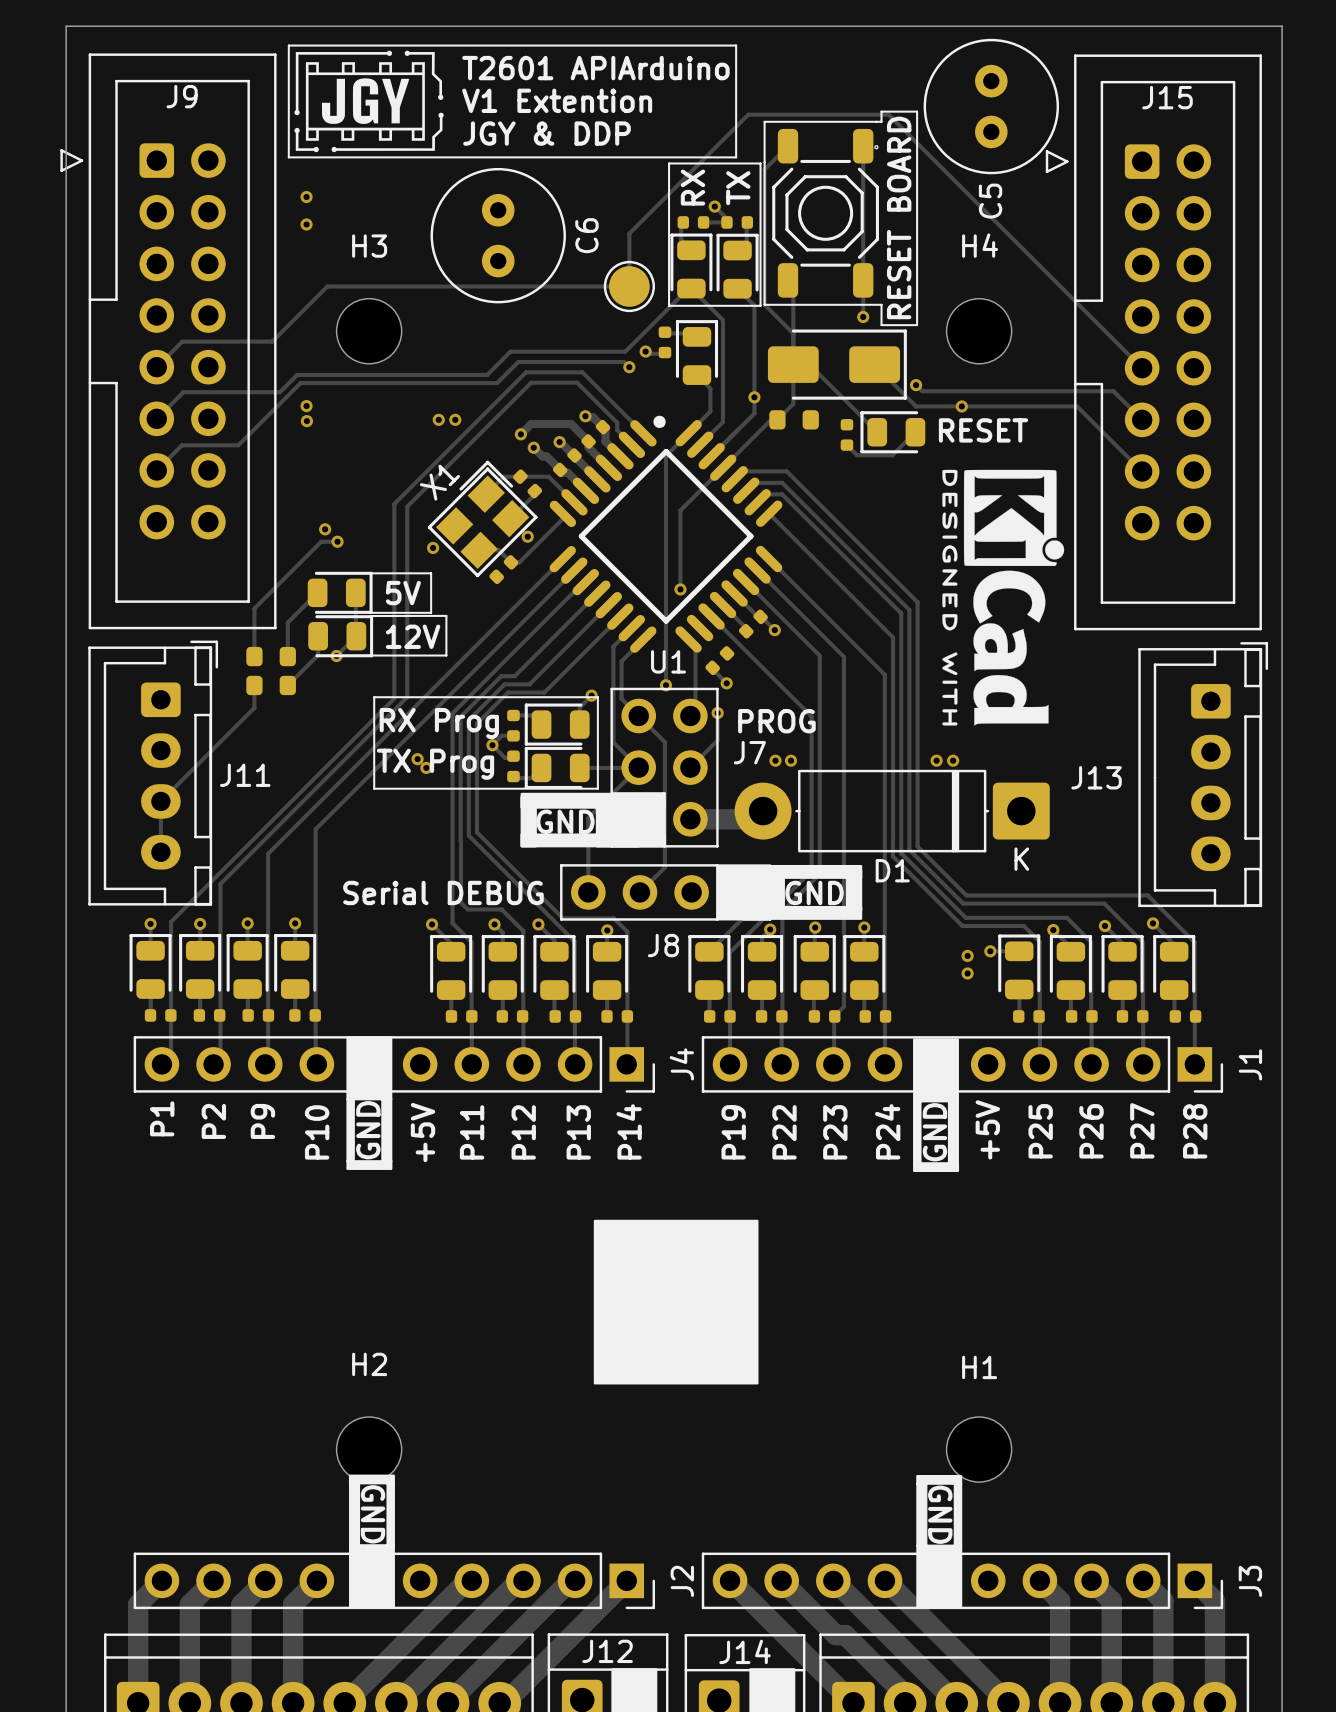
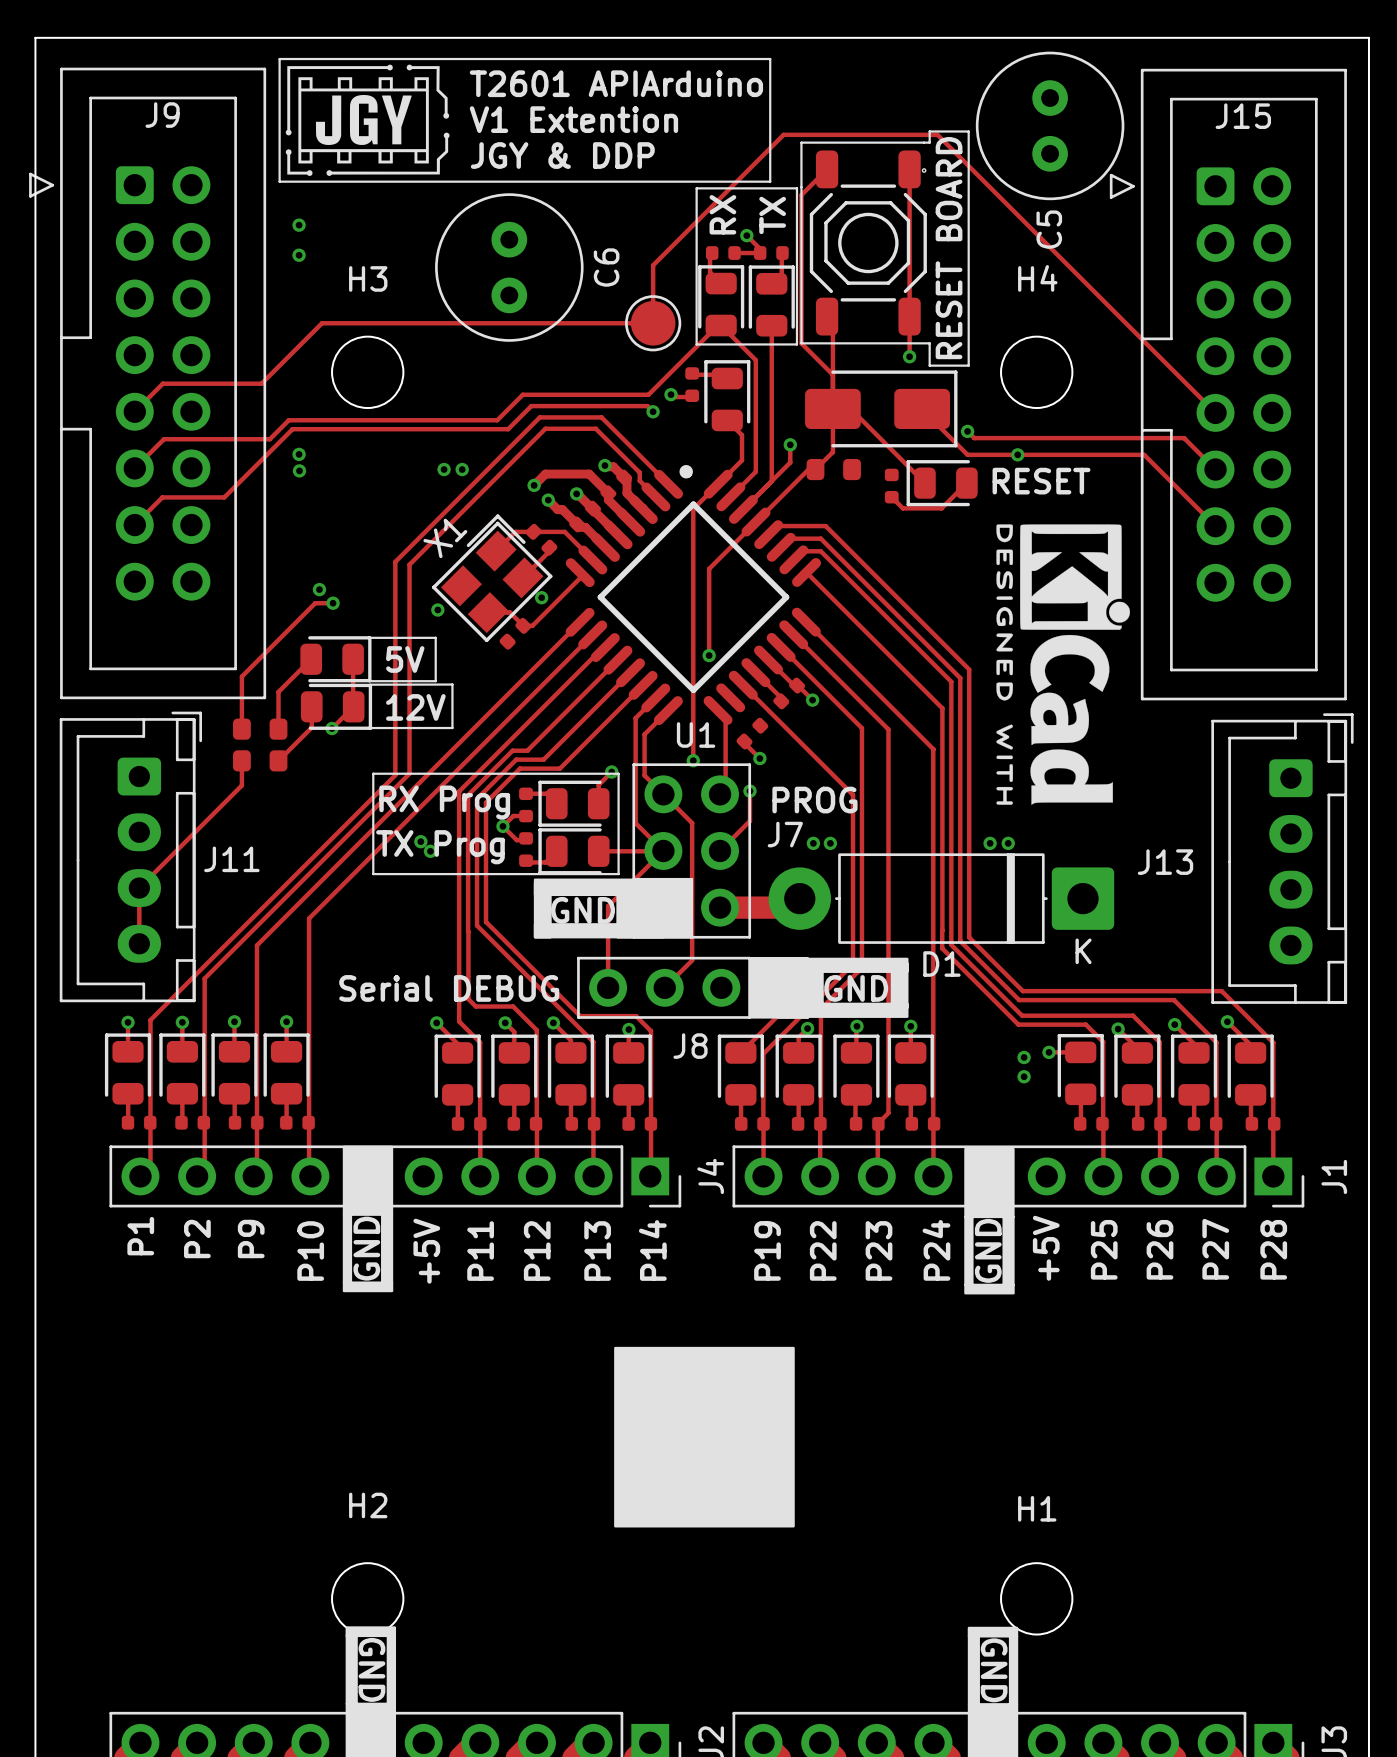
track: (737, 288) (754, 305) (754, 397) -> (771, 325) (771, 481)

